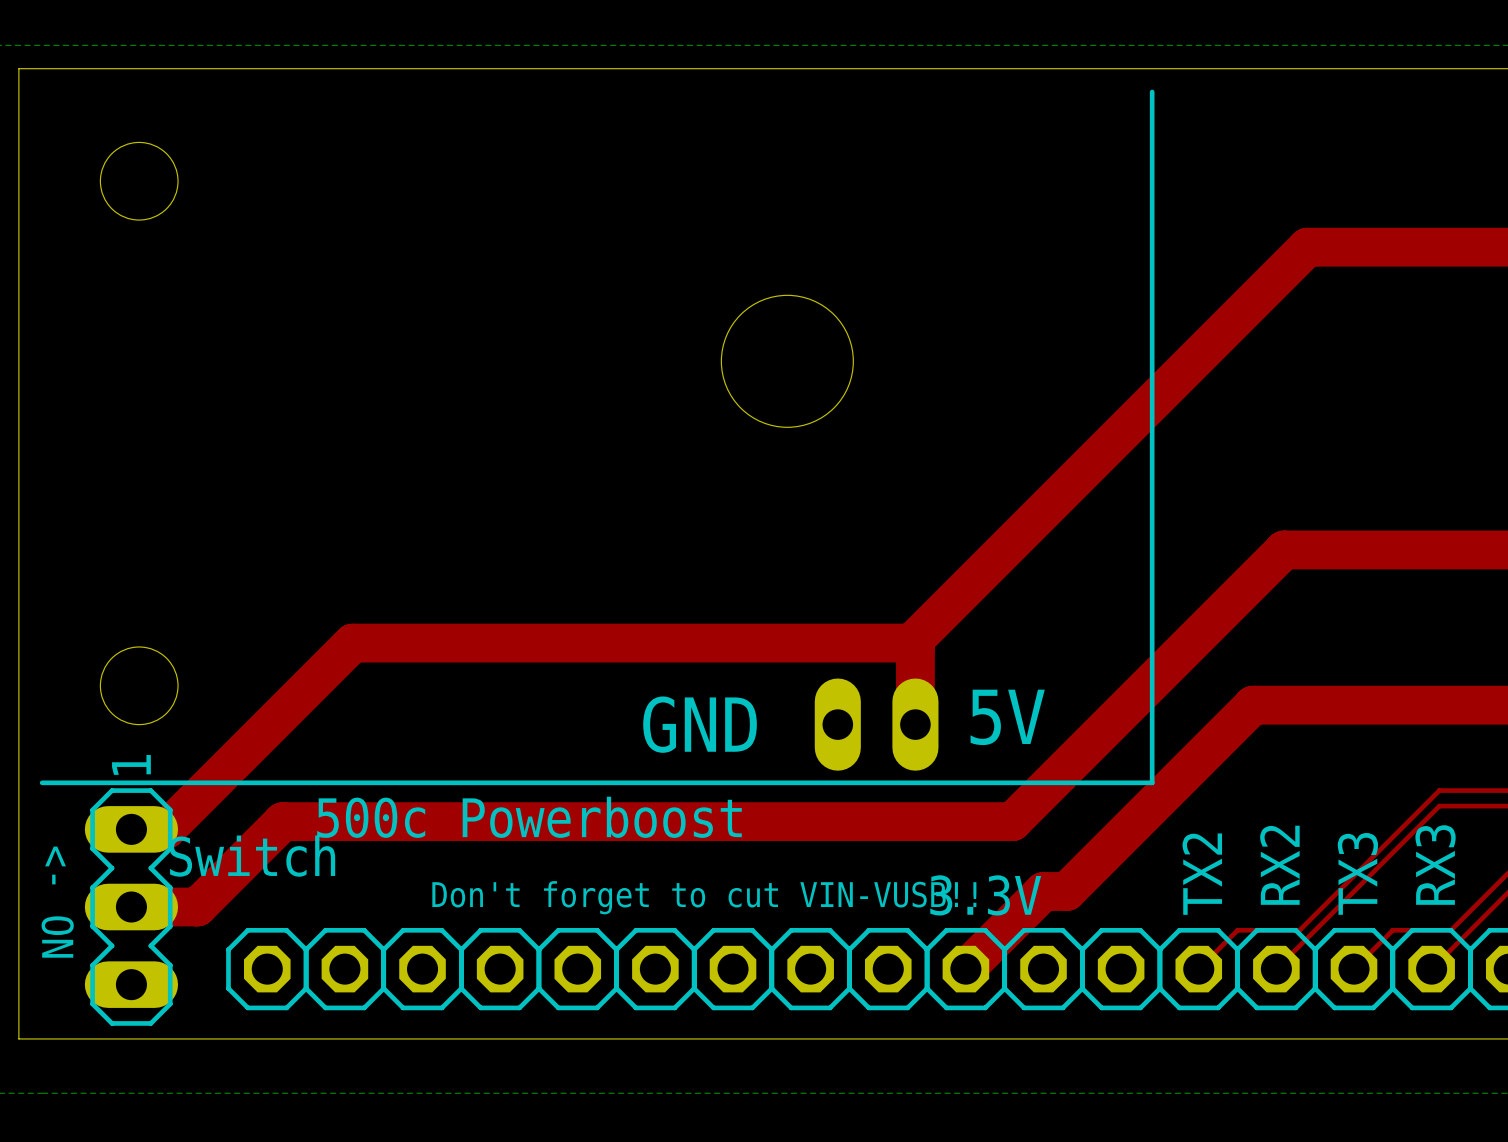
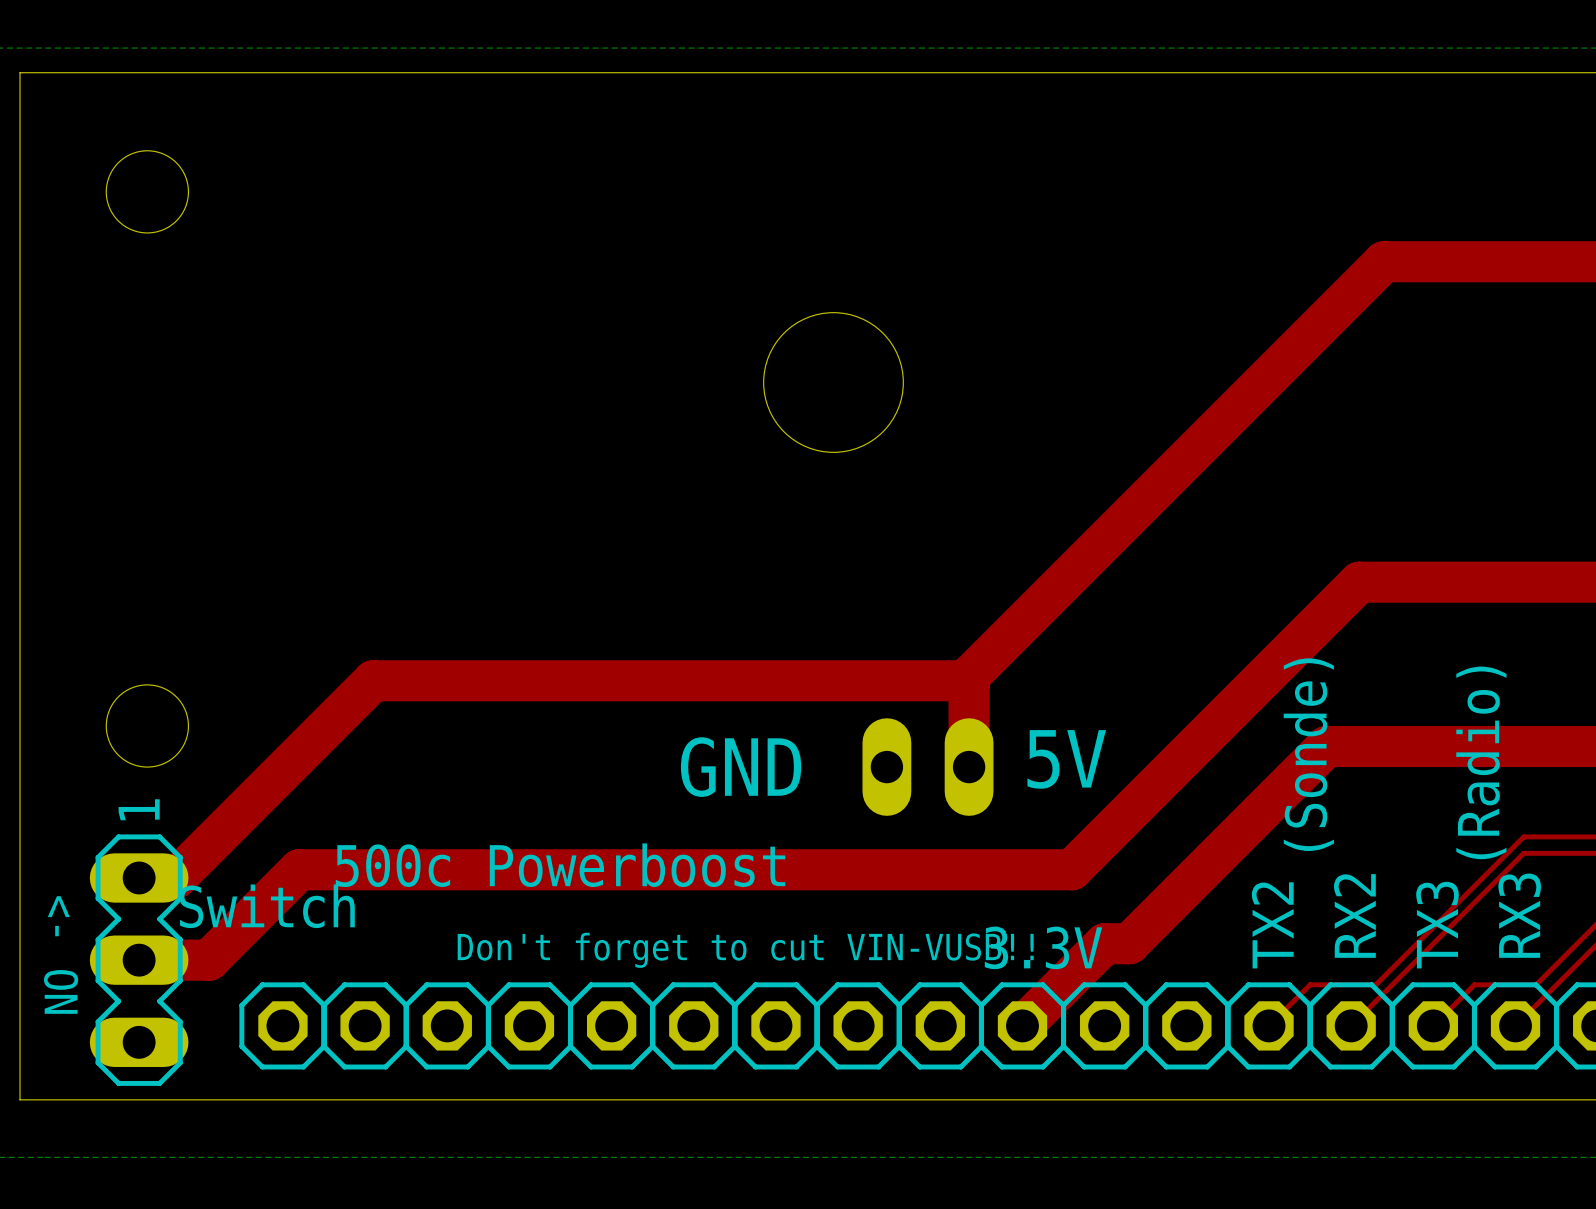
line: (1152, 91) (1152, 782) (42, 782) -> none
text: none -> (Sonde) (1308, 754)
text: none -> (Radio) (1481, 762)

